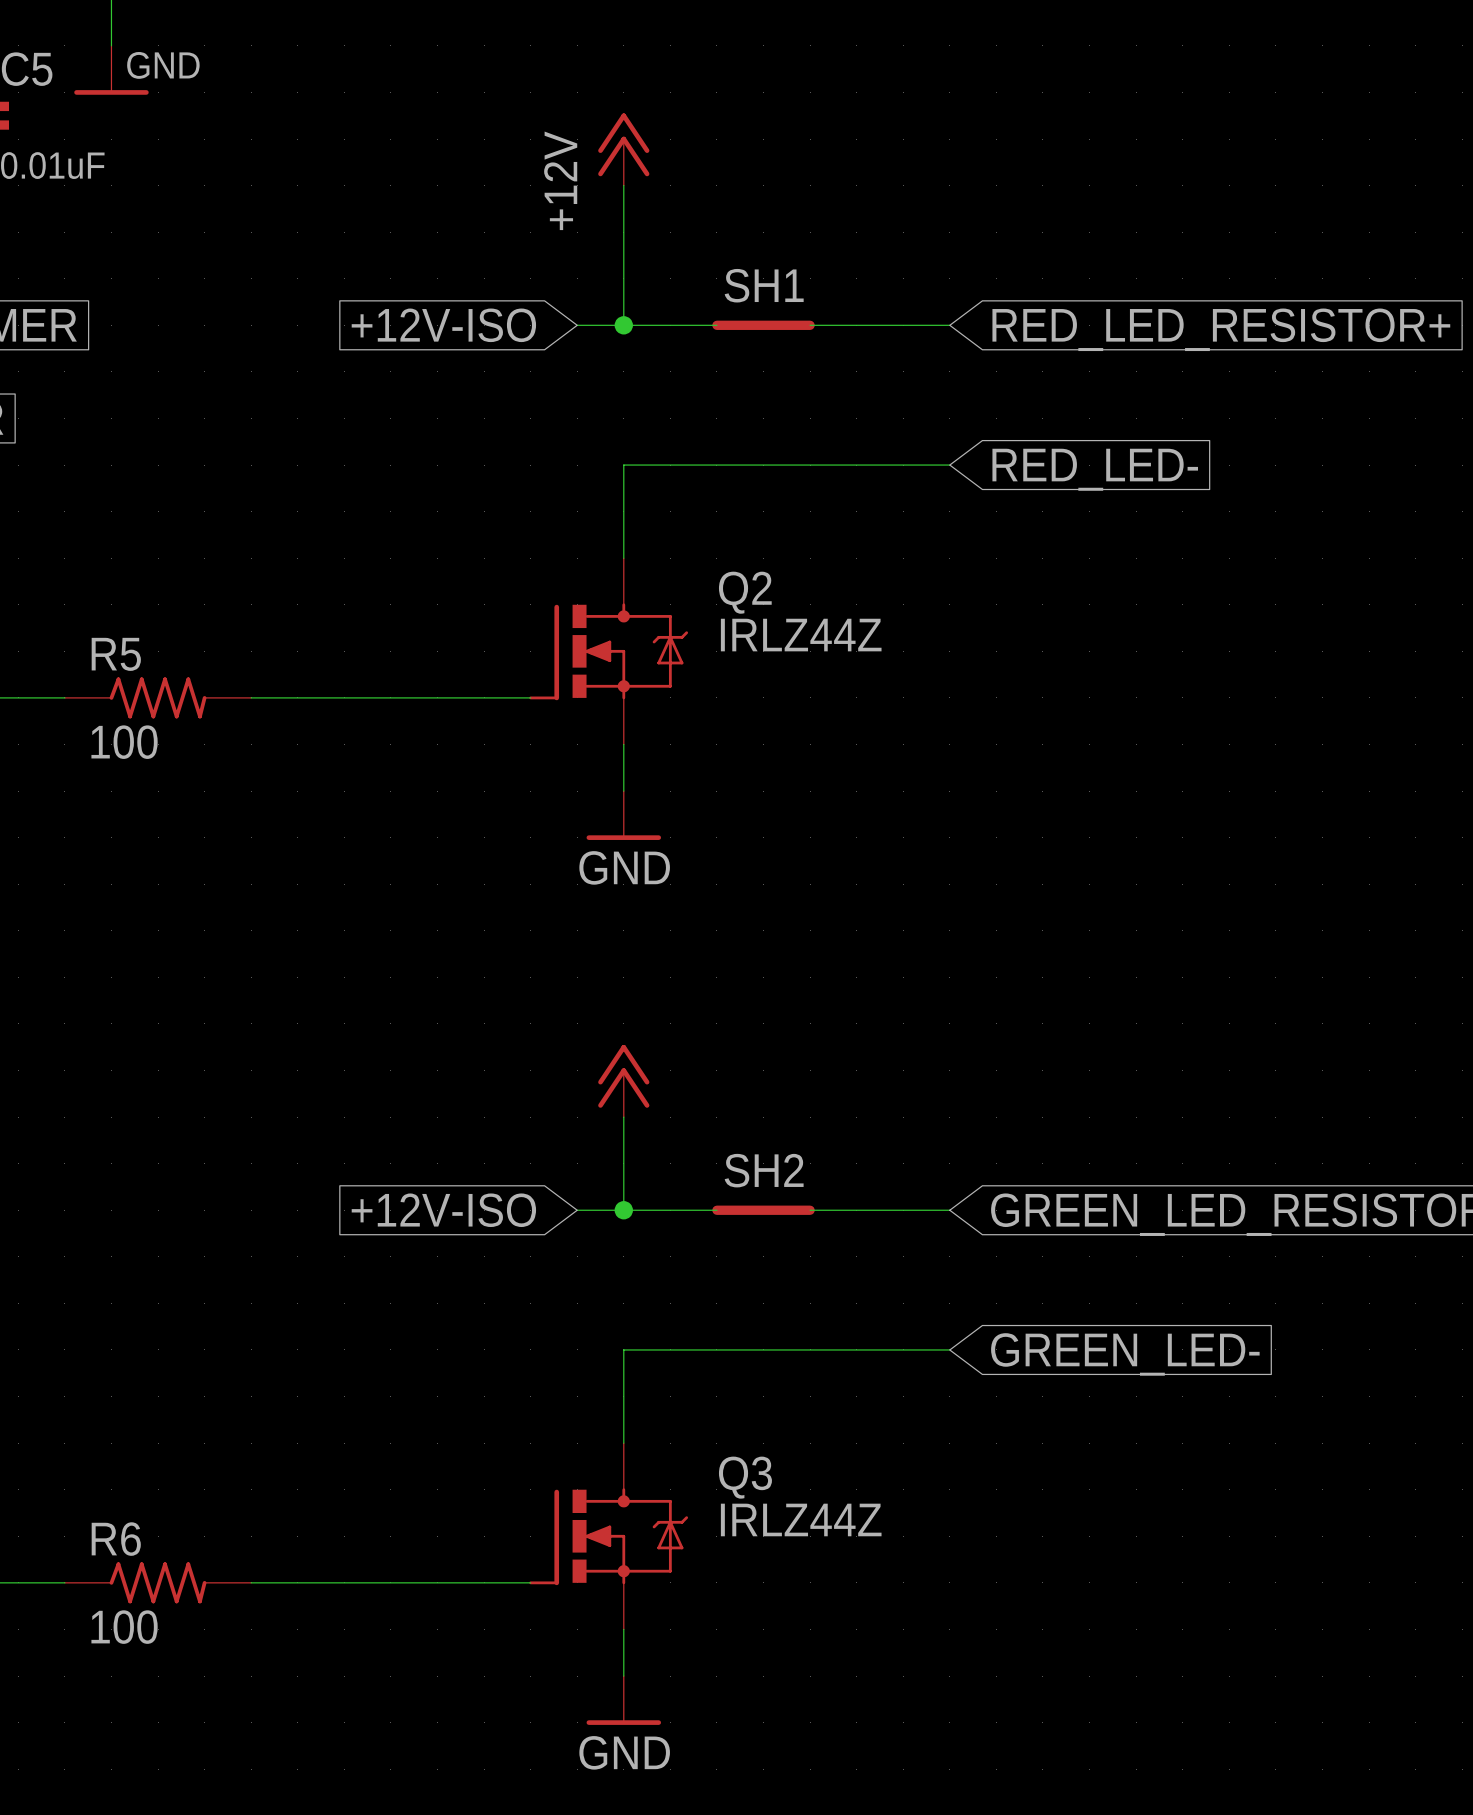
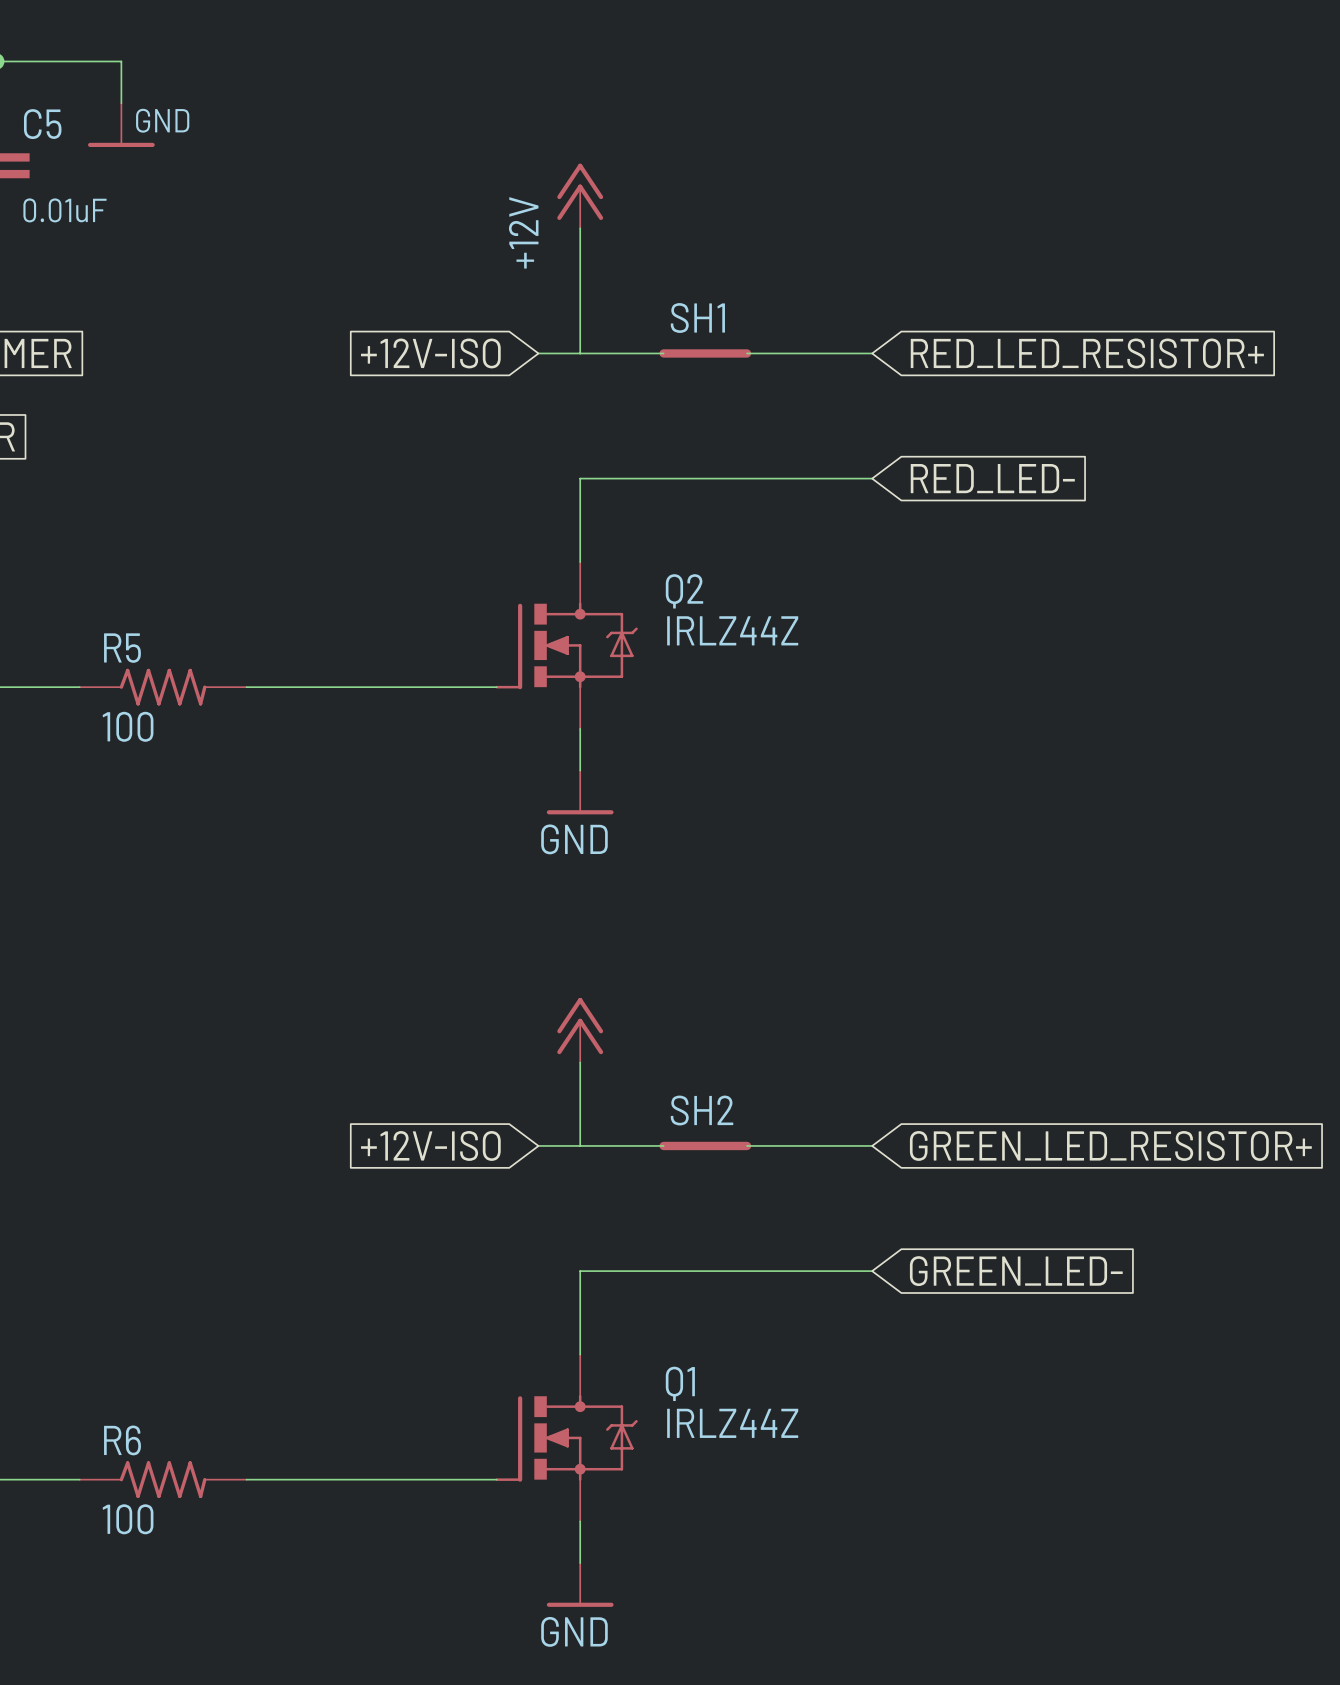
junction: (623, 325) -> none
junction: (623, 1210) -> none
Q3 name: Q3 (745, 1477) -> Q1 (680, 1383)

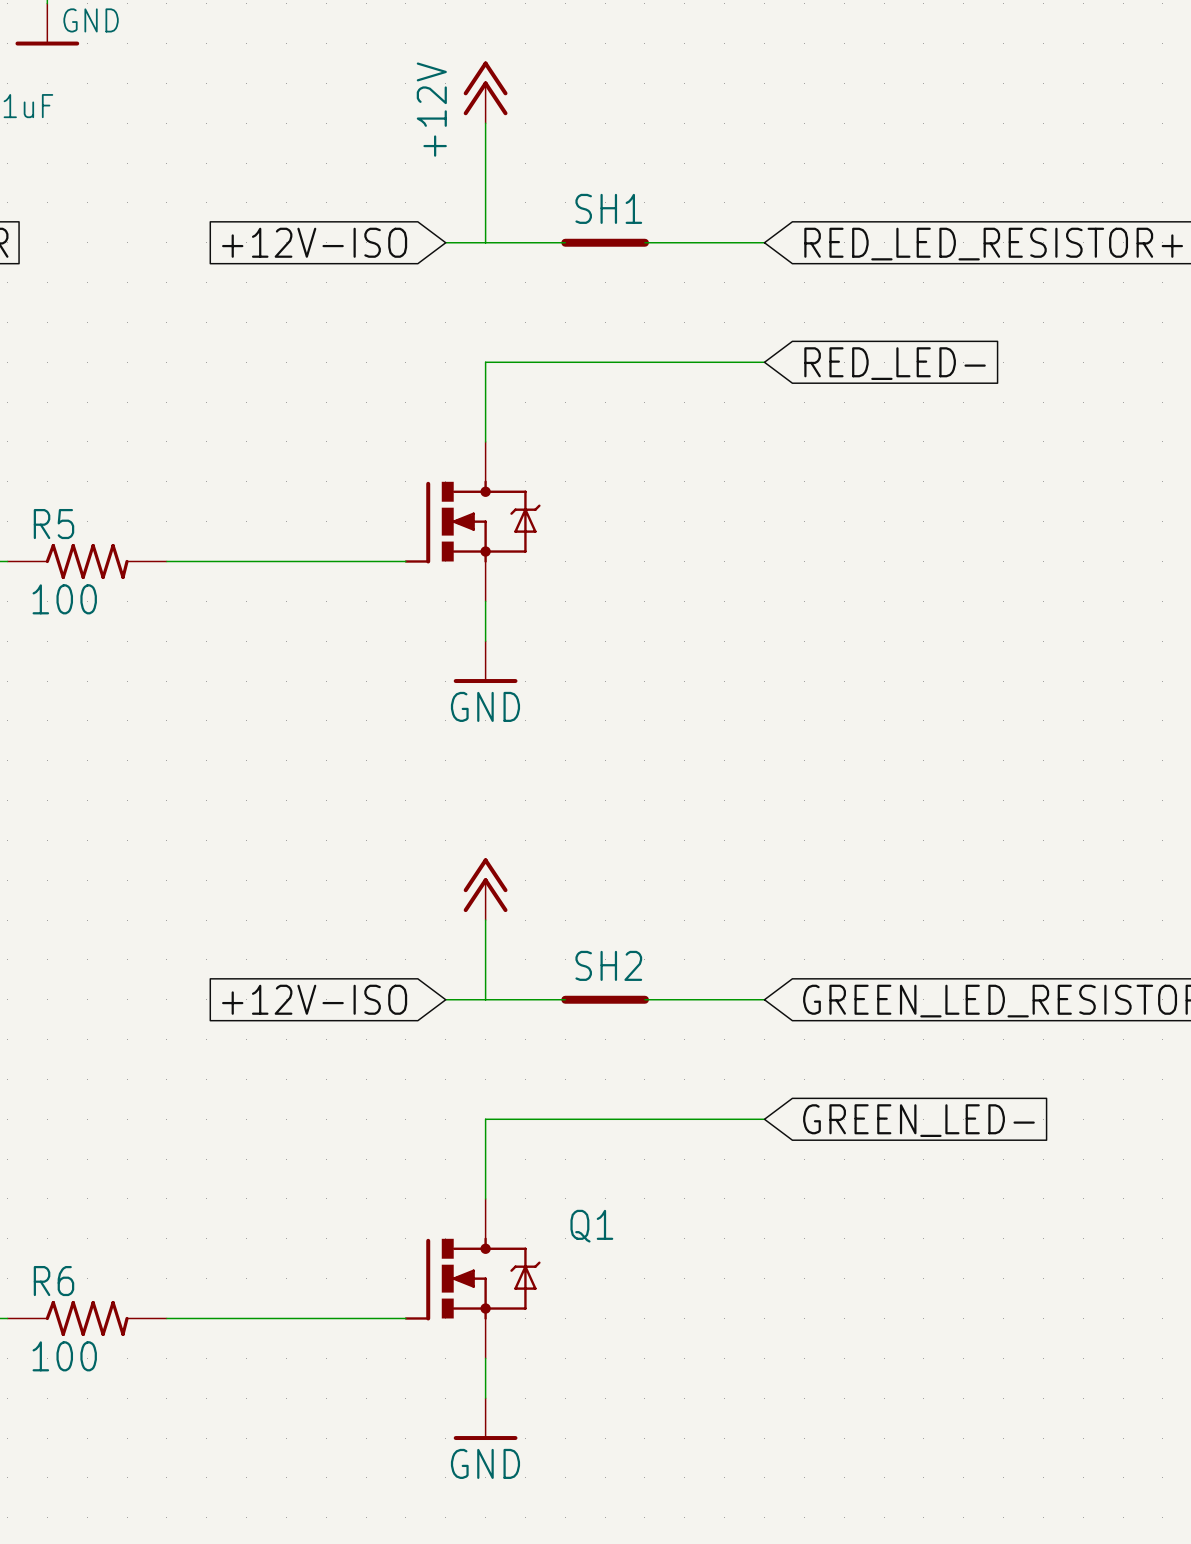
Q2 name: Q2 (684, 591) -> none
Q2 value: IRLZ44Z (732, 630) -> none
Q1 value: IRLZ44Z (732, 1423) -> none

